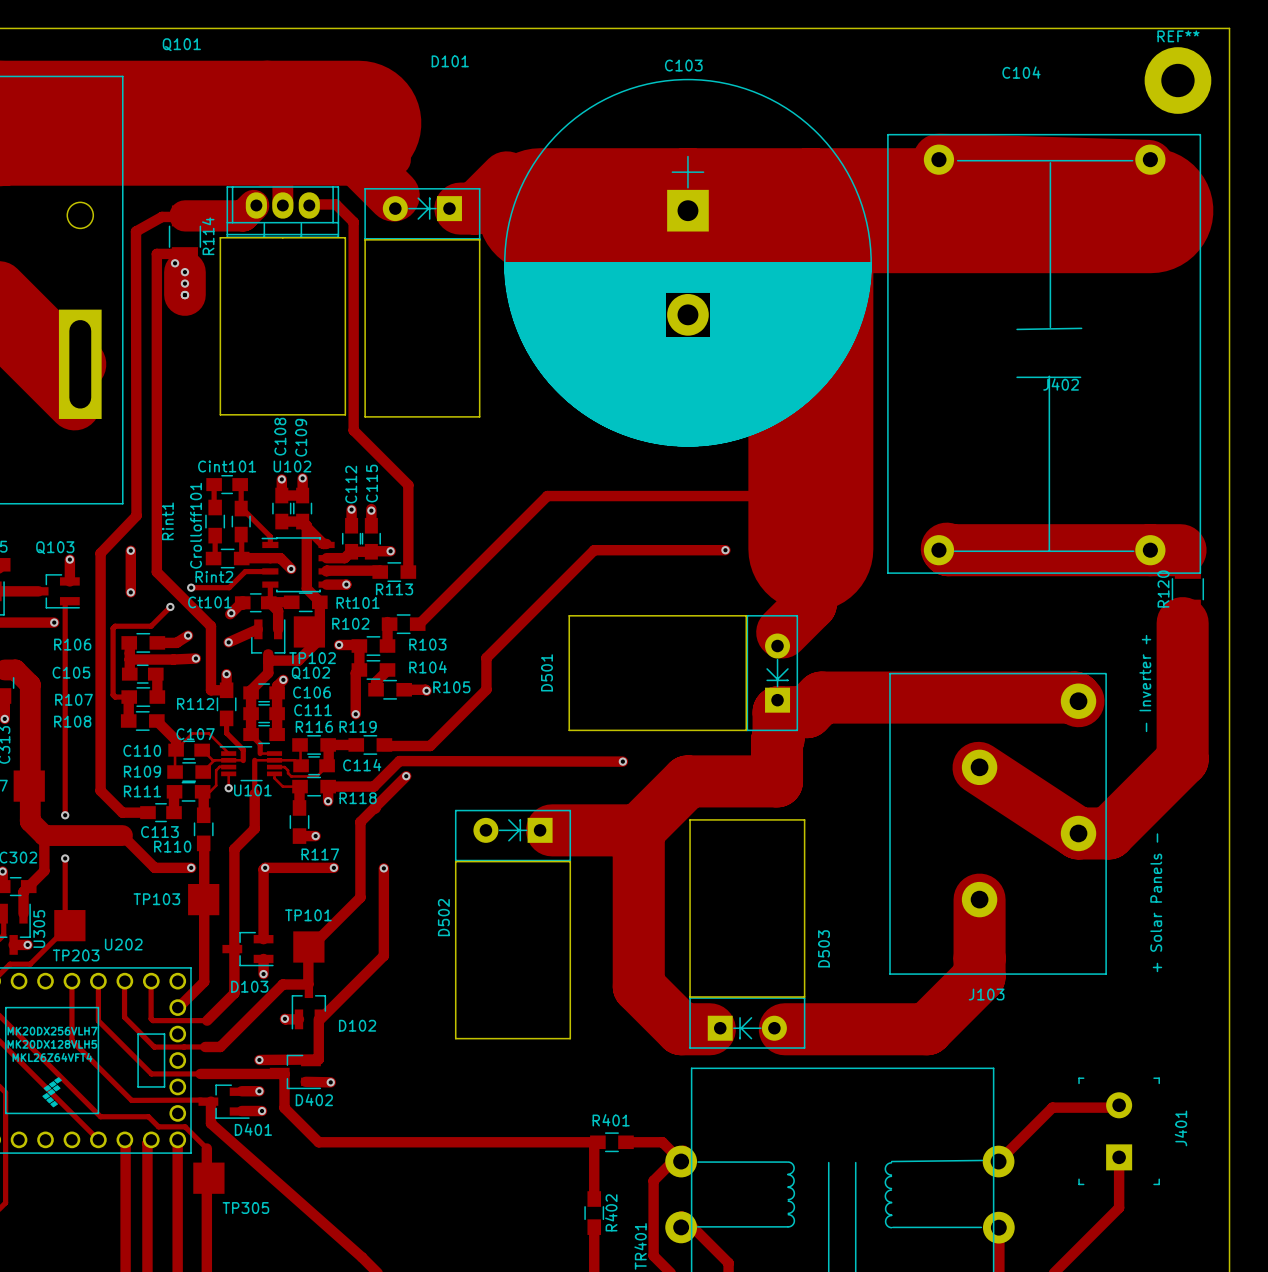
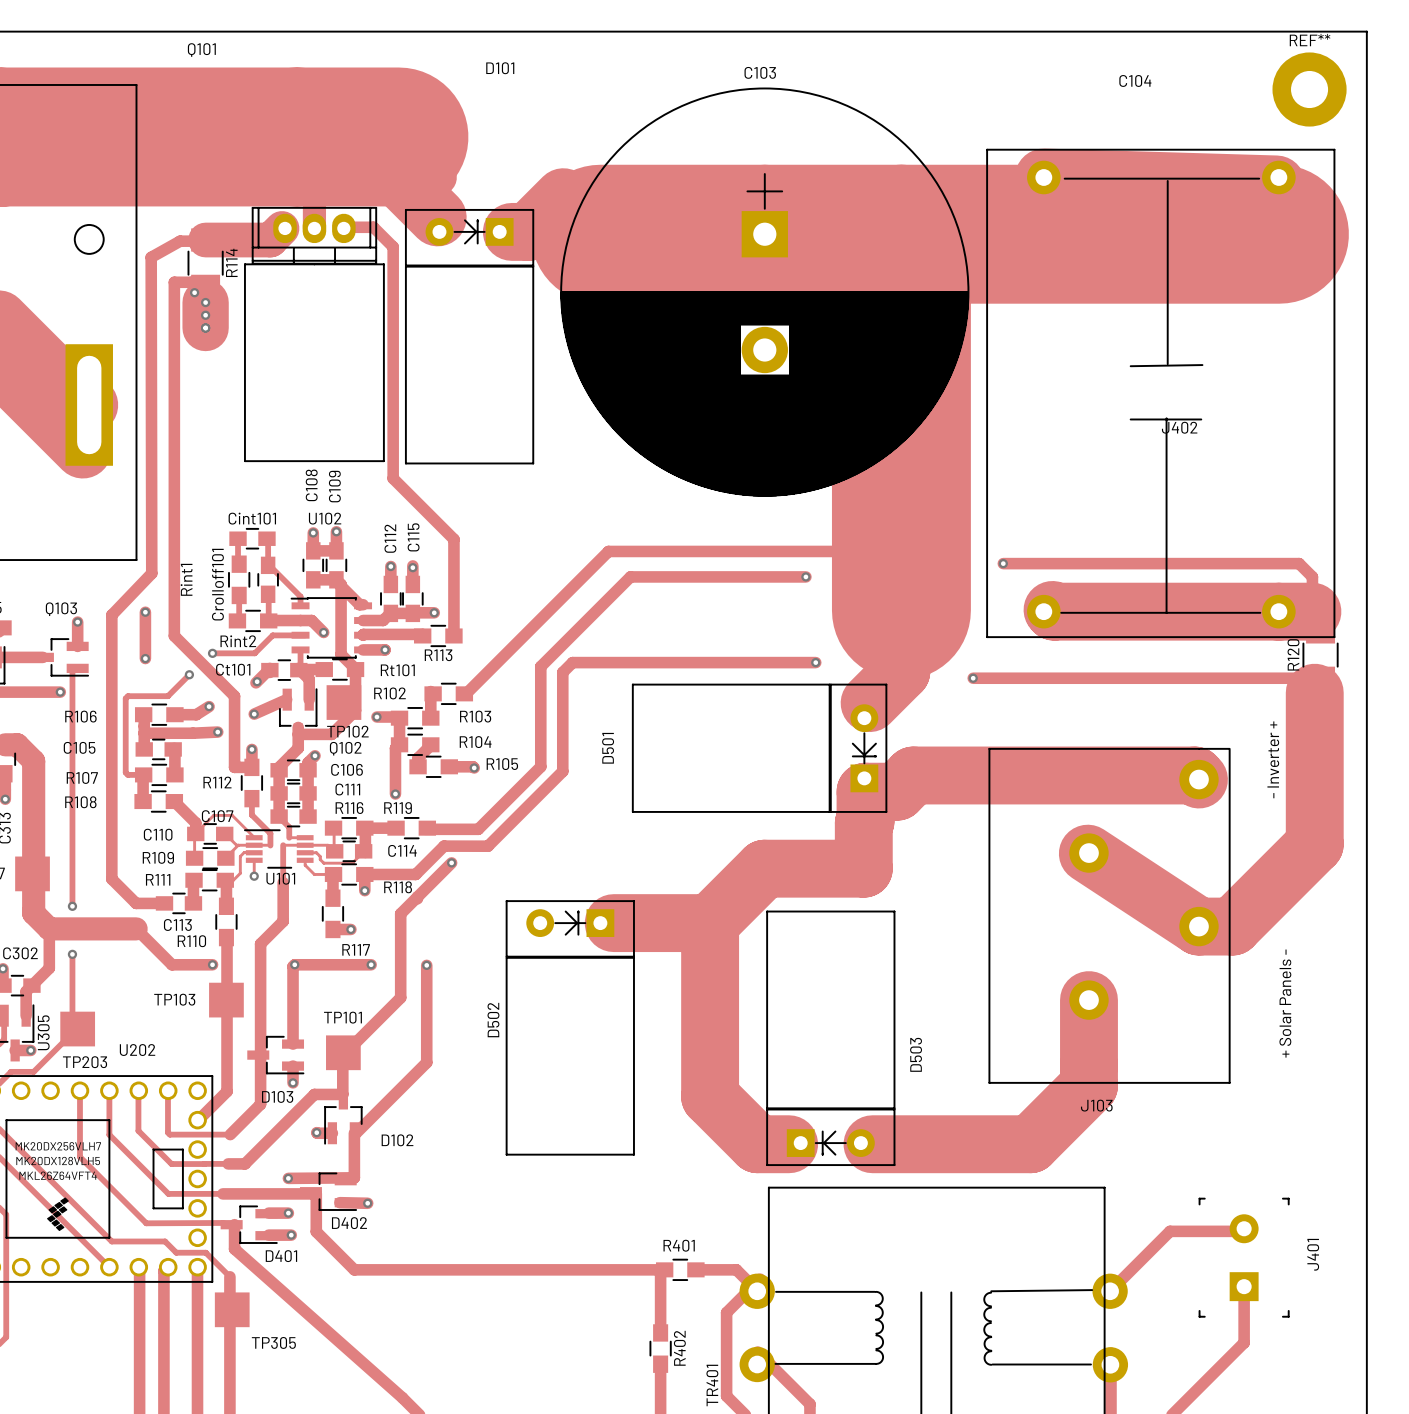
track: none -> (1003, 563) (1299, 563) (1312, 576) (1312, 611)
via: none -> (1003, 563)
via: none -> (805, 576)
track: (725, 550) (594, 550) (486, 657) -> (805, 576) (630, 576) (540, 666) (540, 731)
via: (725, 550) -> none
via: none -> (815, 662)
track: none -> (973, 678) (1320, 678)
via: none -> (973, 678)
track: (438, 761) (622, 761) -> (488, 846) (562, 771) (562, 672) (572, 662) (815, 662)
via: (622, 761) -> none

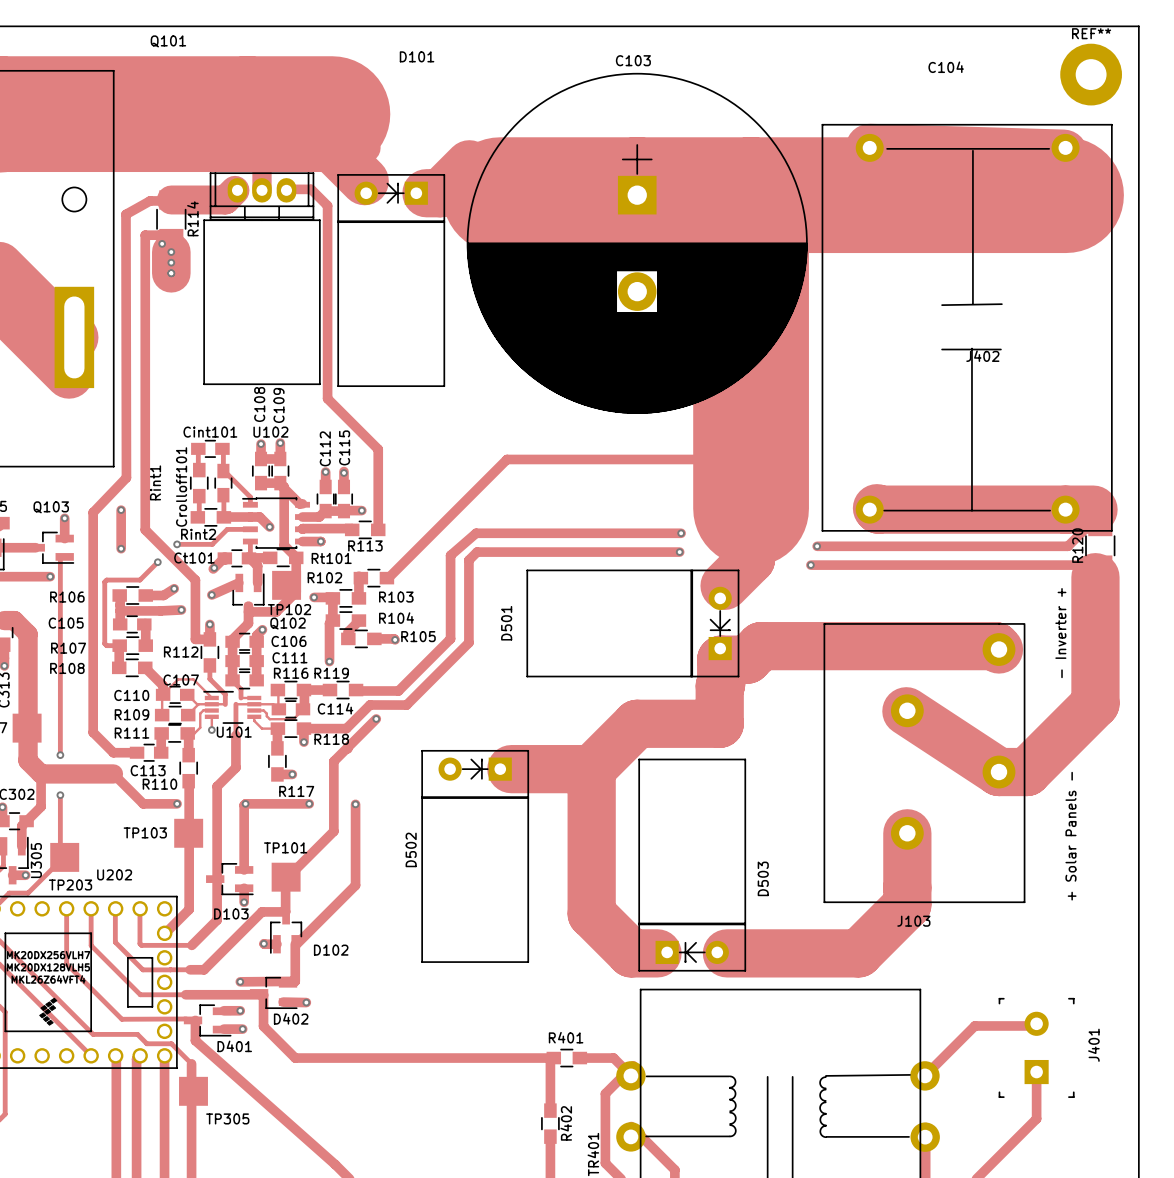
track: (1003, 563) (1299, 563) (1312, 576) (1312, 611) -> none
via: (1003, 563) -> none
track: (805, 576) (630, 576) (540, 666) -> (681, 533) (476, 533) (450, 555)
via position: (805, 576) -> (681, 533)
track: none -> (1100, 526) (1087, 526) (1067, 546) (817, 546)
via: none -> (817, 546)

